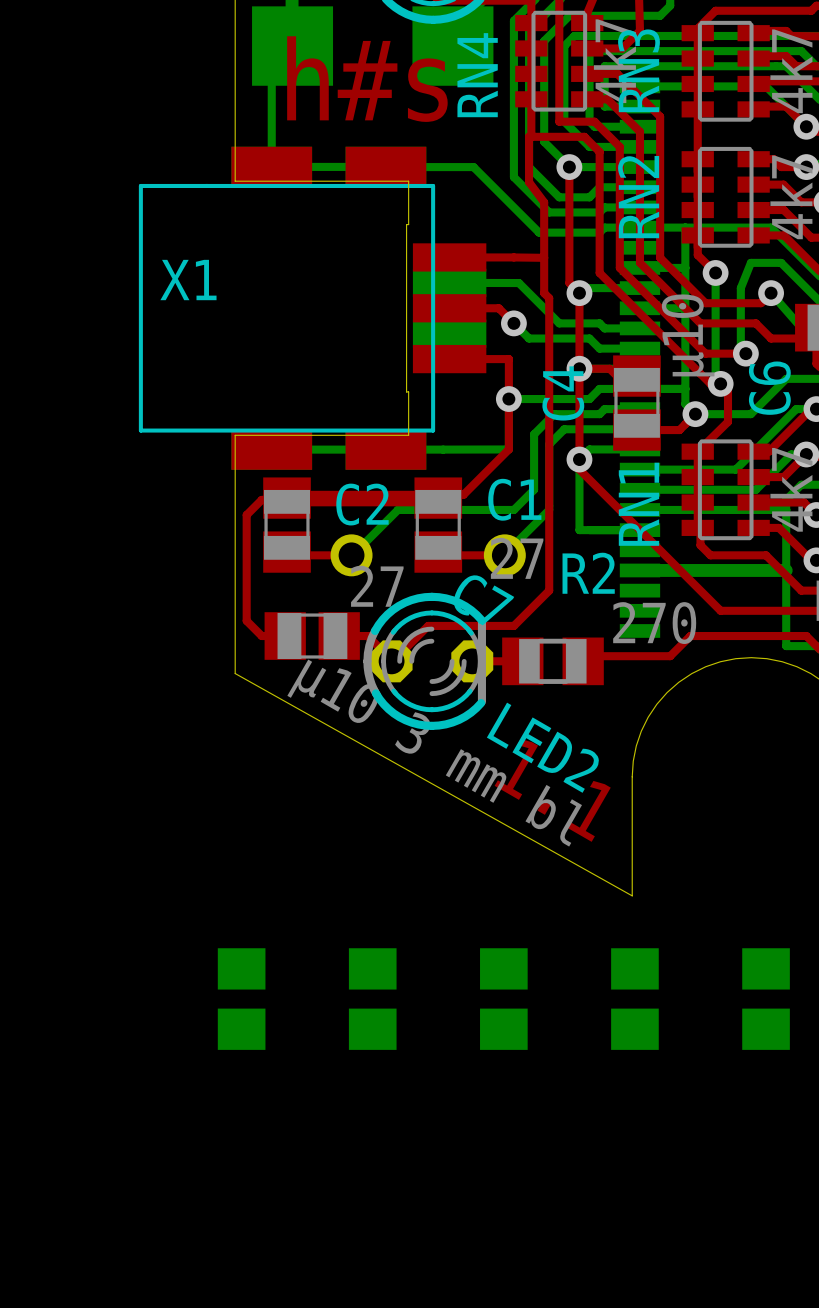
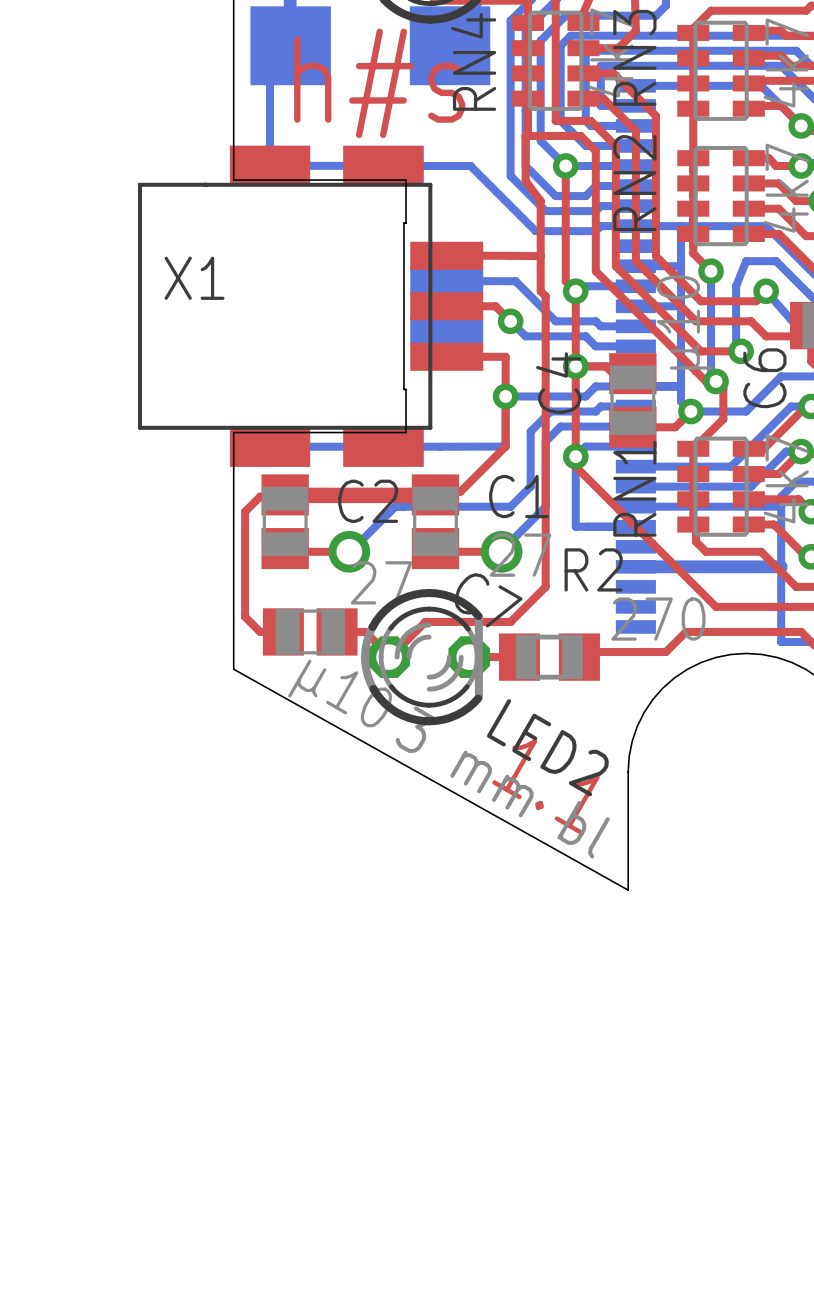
part: (241, 999) -> none
part: (372, 999) -> none
part: (503, 999) -> none
part: (634, 999) -> none
part: (766, 999) -> none

